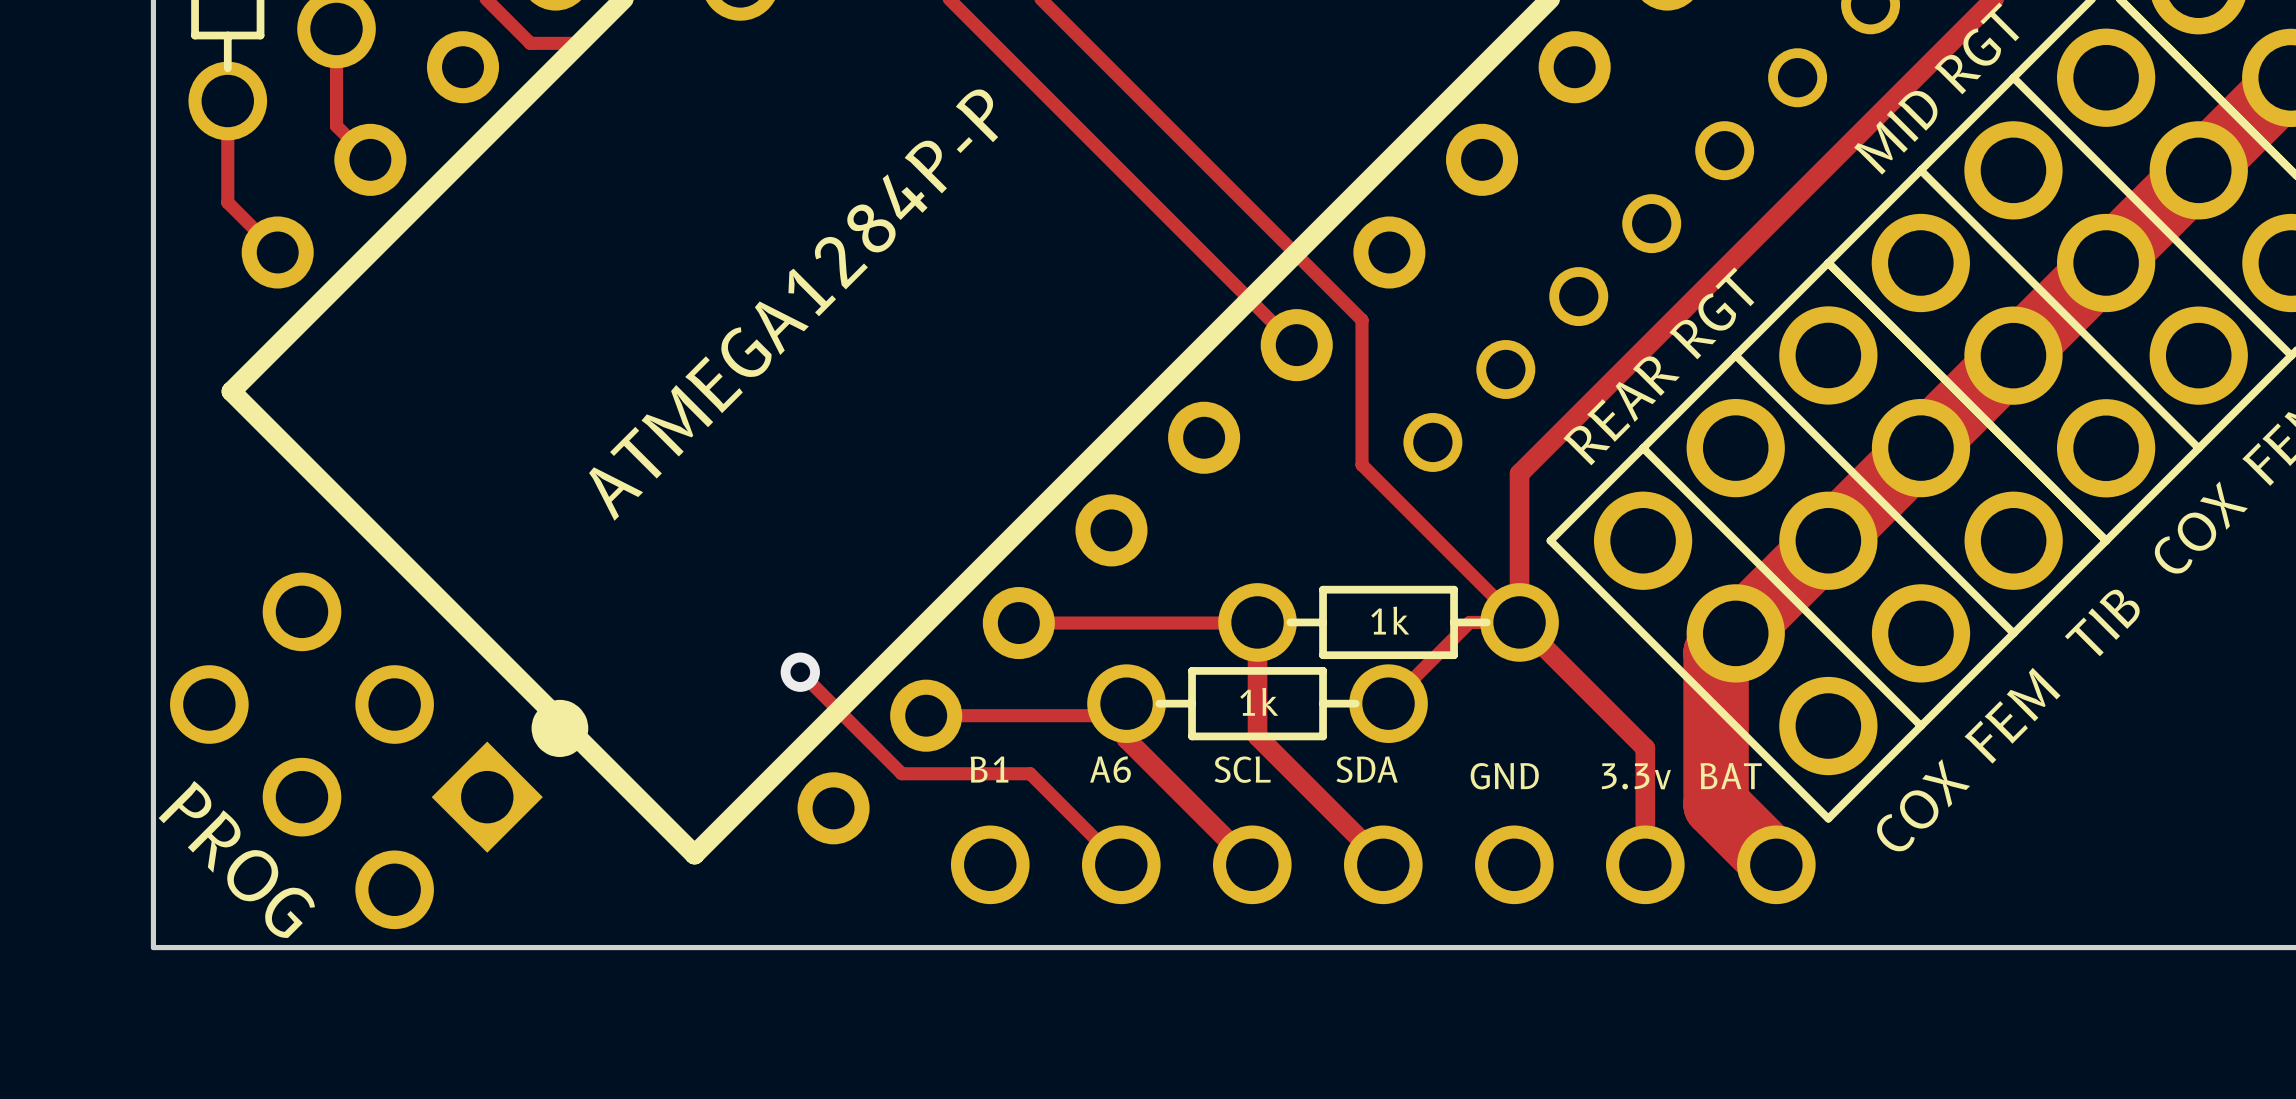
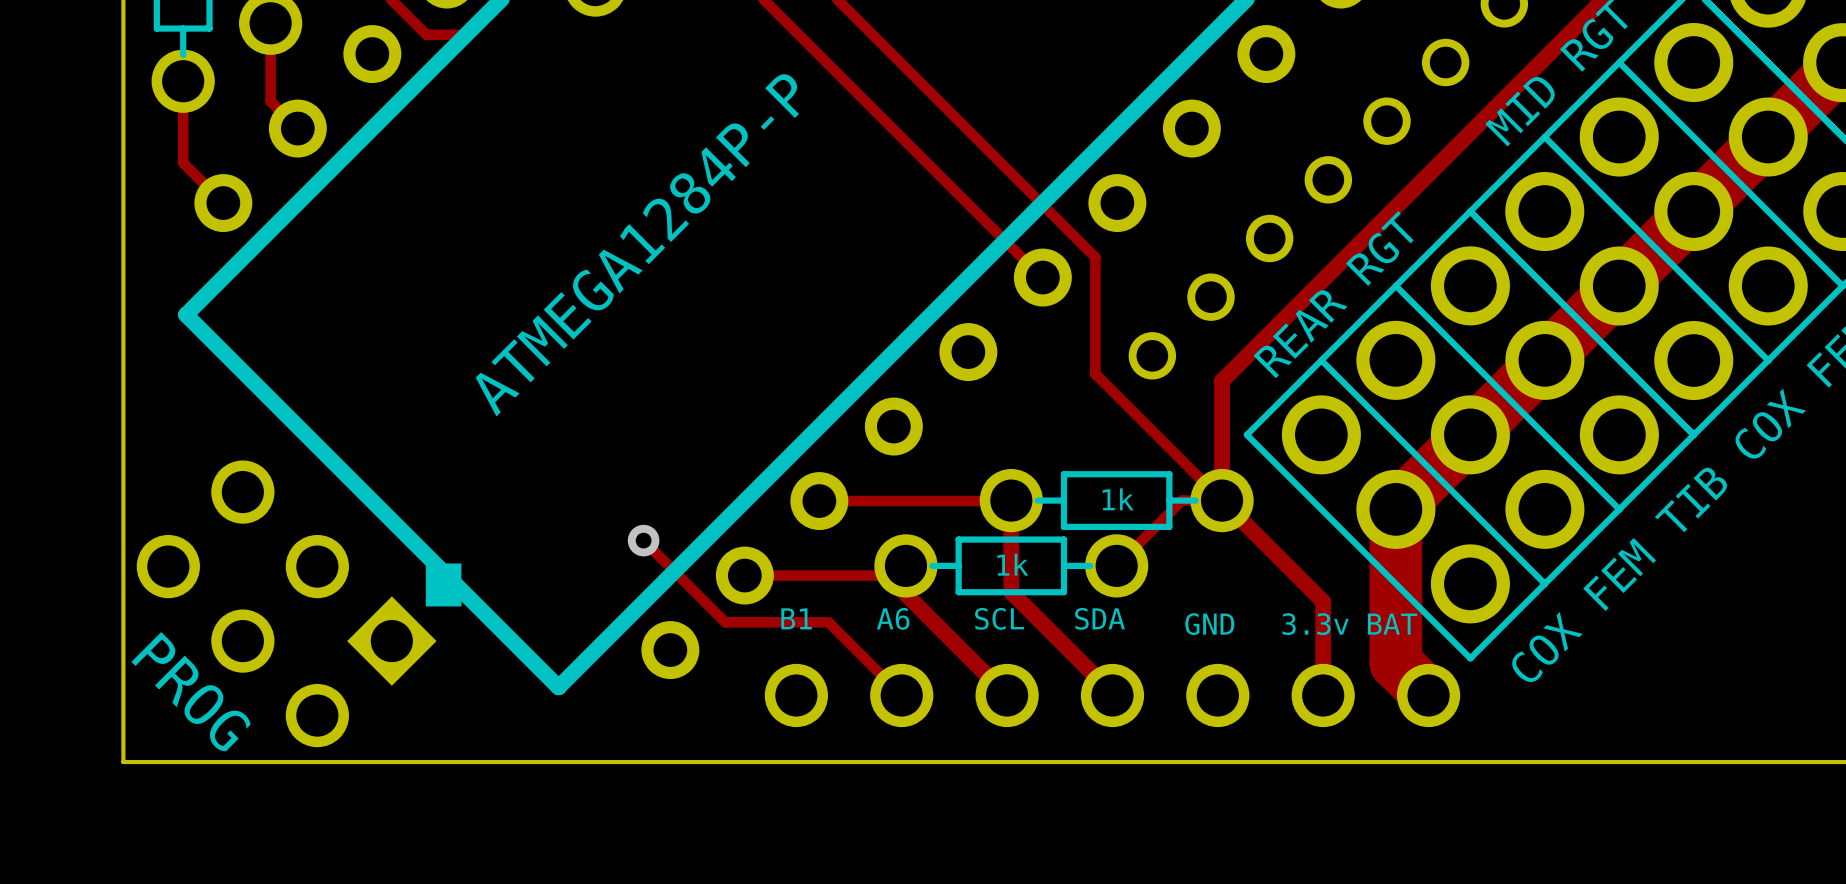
track: (1735, 633) (1716, 652) (1716, 804) (1735, 824) -> (1395, 509) (1395, 662)

